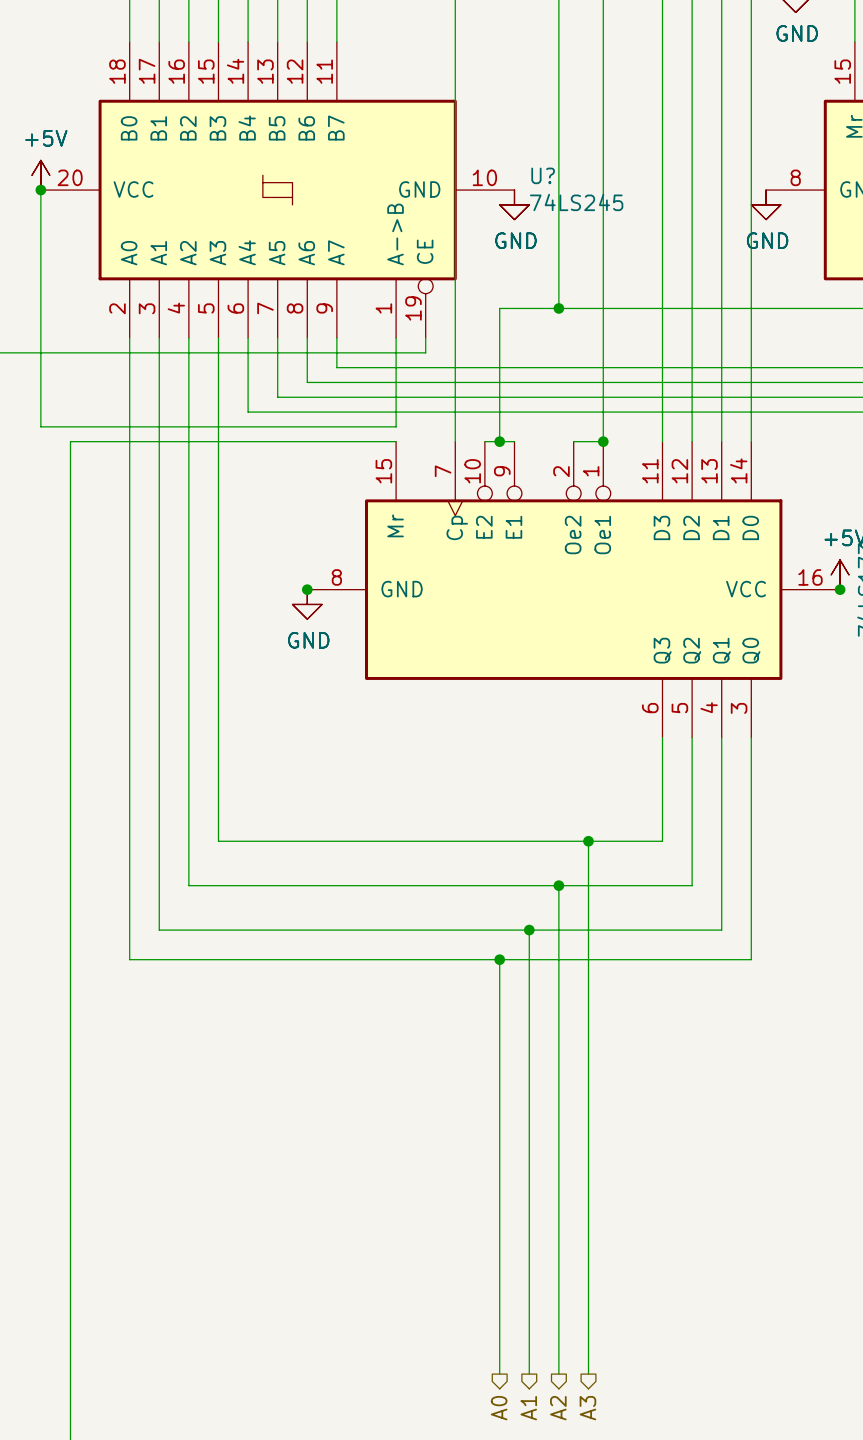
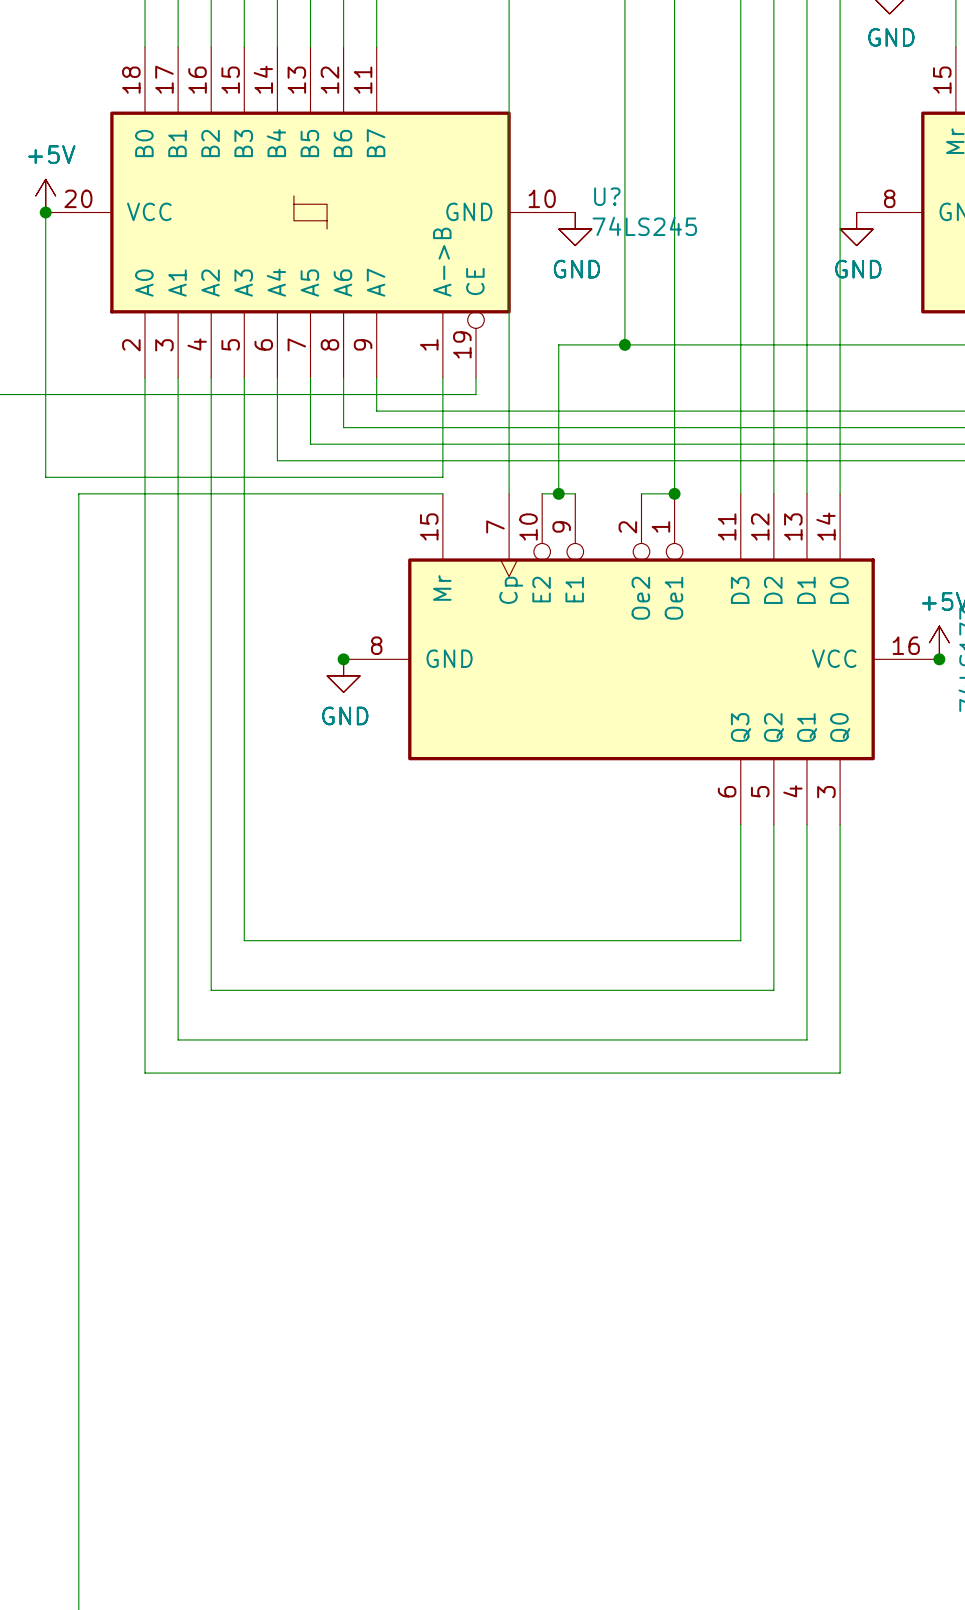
wire: (588, 841) (588, 1374) -> none
junction: (588, 841) -> none
wire: (558, 885) (558, 1374) -> none
junction: (558, 885) -> none
wire: (529, 930) (529, 1374) -> none
junction: (529, 930) -> none
wire: (499, 959) (499, 1374) -> none
junction: (499, 959) -> none
hierarchical label: A0 (499, 1408) -> none
hierarchical label: A1 (528, 1408) -> none
hierarchical label: A2 (558, 1408) -> none
hierarchical label: A3 (587, 1408) -> none

